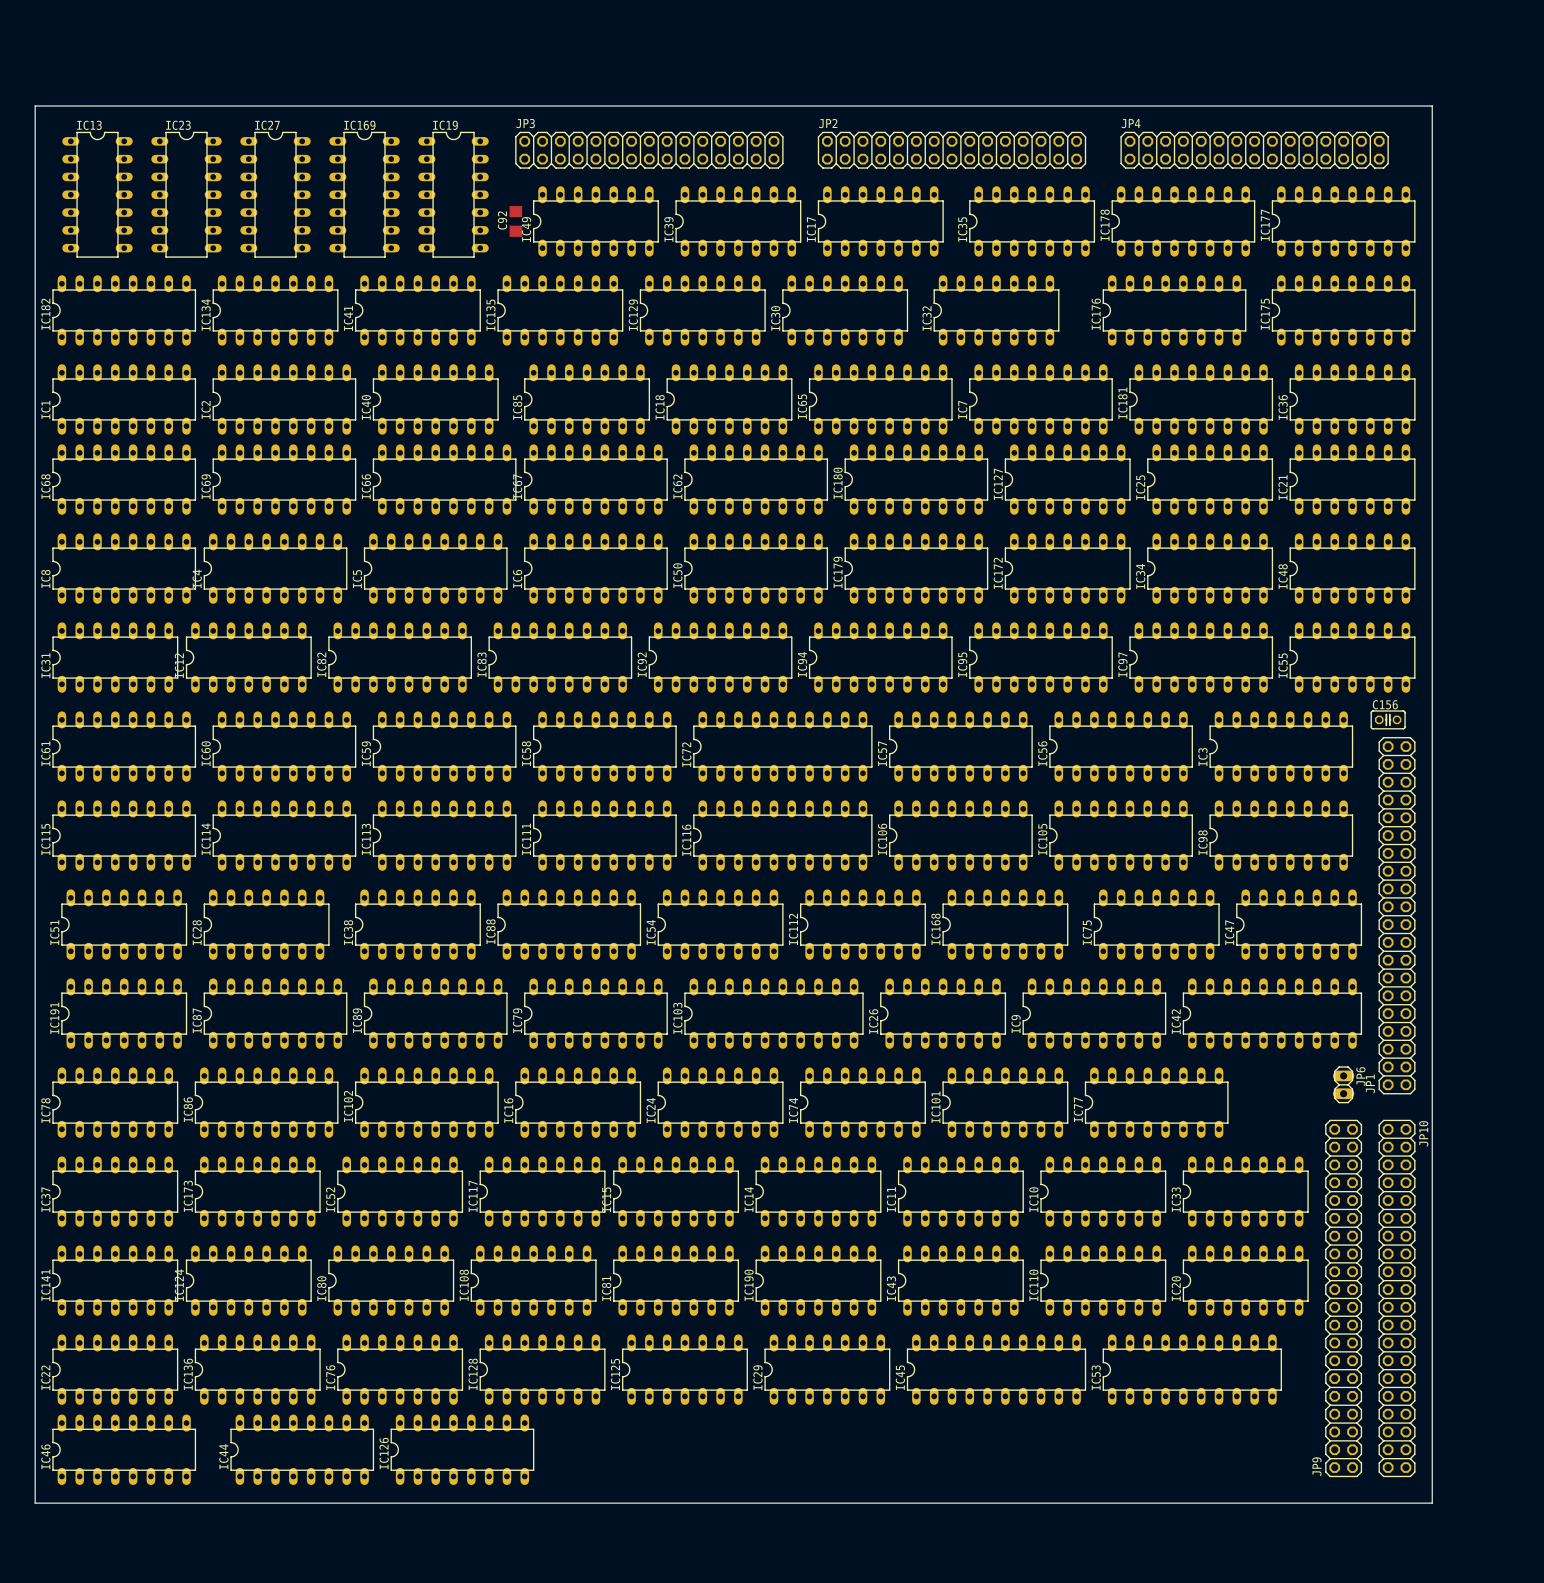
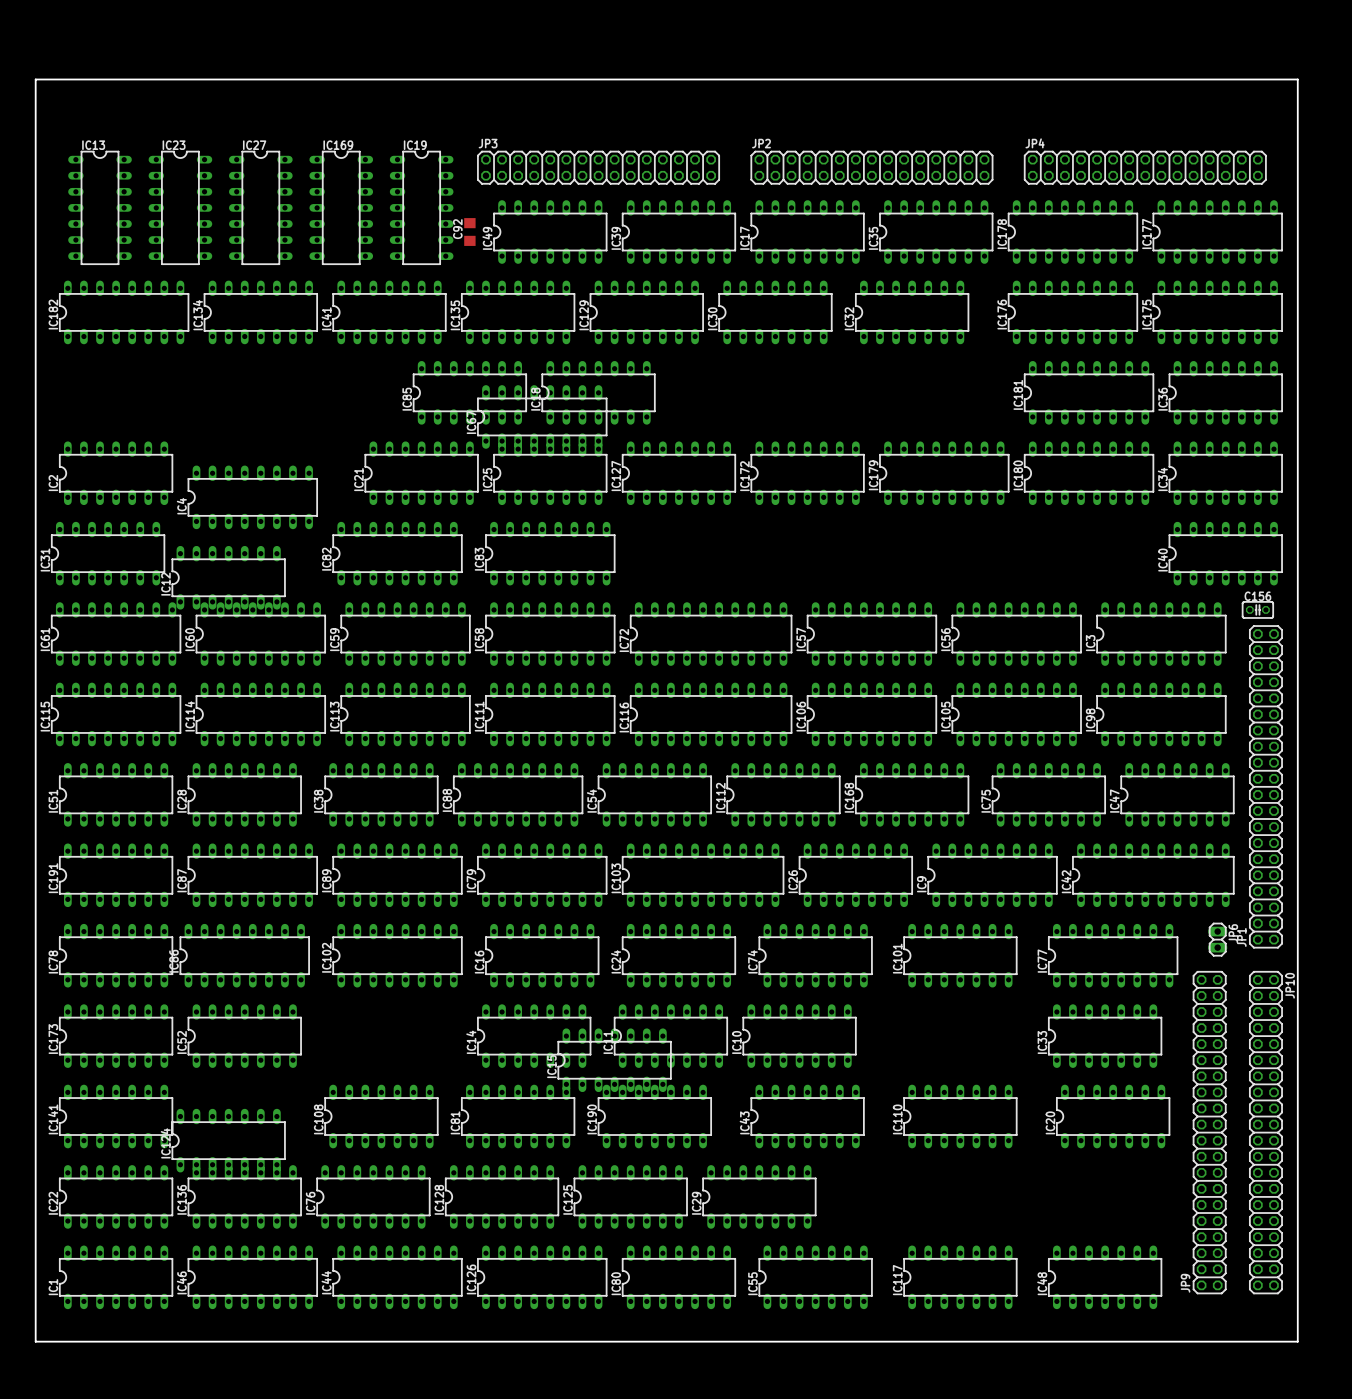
JP3 position: (649, 150) -> (598, 167)
JP2 position: (951, 150) -> (871, 167)
JP4 position: (1254, 150) -> (1145, 167)
IC13 position: (97, 194) -> (100, 207)
IC23 position: (186, 194) -> (180, 207)
IC27 position: (275, 194) -> (260, 207)
IC169 position: (364, 194) -> (341, 207)
IC19 position: (453, 194) -> (421, 207)
C92 position: (515, 221) -> (469, 232)
IC49 position: (595, 221) -> (550, 232)
IC39 position: (738, 221) -> (678, 232)
IC17 position: (880, 221) -> (807, 232)
IC35 position: (1032, 221) -> (936, 232)
IC178 position: (1183, 221) -> (1072, 232)
IC177 position: (1343, 221) -> (1217, 232)
IC182 position: (124, 310) -> (124, 312)
IC134 position: (275, 310) -> (260, 312)
IC41 position: (417, 310) -> (389, 312)
IC135 position: (560, 310) -> (518, 312)
IC129 position: (702, 310) -> (646, 312)
IC30 position: (845, 310) -> (775, 312)
IC32 position: (996, 310) -> (912, 312)
IC176 position: (1174, 310) -> (1072, 312)
IC175 position: (1343, 310) -> (1217, 312)
IC1 footprint: [52, 364, 196, 435] -> [59, 1245, 173, 1310]
IC2 footprint: [212, 364, 357, 435] -> [59, 441, 173, 506]
IC40 position: (435, 399) -> (1225, 553)
IC85 position: (587, 399) -> (469, 392)
IC18 position: (729, 399) -> (598, 392)
IC65: (880, 399) -> none
IC7: (1041, 399) -> none
IC181 position: (1201, 399) -> (1089, 392)
IC36 position: (1352, 399) -> (1225, 392)
IC68: (124, 479) -> none
IC69: (284, 479) -> none
IC66: (444, 479) -> none
IC62: (756, 479) -> none
IC180 position: (916, 479) -> (1089, 473)
IC127 position: (1067, 479) -> (678, 473)
IC25 position: (1210, 479) -> (550, 473)
IC21 position: (1352, 479) -> (421, 473)
IC8: (124, 568) -> none
IC5: (435, 568) -> none
IC6: (595, 568) -> none
IC50: (756, 568) -> none
IC179 position: (916, 568) -> (944, 473)
IC172 position: (1067, 568) -> (807, 473)
IC34 position: (1210, 568) -> (1225, 473)
IC48 position: (1352, 568) -> (1105, 1277)
IC31 position: (115, 657) -> (108, 553)
IC82 position: (400, 657) -> (397, 553)
IC83 position: (560, 657) -> (550, 553)
IC92: (720, 657) -> none
IC94: (880, 657) -> none
IC95: (1041, 657) -> none
IC97: (1201, 657) -> none
IC55 position: (1352, 657) -> (815, 1277)
C156 position: (1388, 719) -> (1257, 609)
IC61 position: (124, 746) -> (116, 634)
IC60 position: (284, 746) -> (260, 634)
IC59 position: (444, 746) -> (405, 634)
IC58 position: (604, 746) -> (550, 634)
IC72 position: (782, 746) -> (711, 634)
IC57 position: (960, 746) -> (871, 634)
IC56 position: (1121, 746) -> (1016, 634)
IC3 position: (1281, 746) -> (1161, 634)
IC115 position: (124, 835) -> (116, 714)
IC114 position: (284, 835) -> (260, 714)
IC113 position: (444, 835) -> (405, 714)
IC111 position: (604, 835) -> (550, 714)
IC116 position: (782, 835) -> (711, 714)
IC106 position: (960, 835) -> (871, 714)
IC105 position: (1121, 835) -> (1016, 714)
IC98 position: (1281, 835) -> (1161, 714)
JP1 position: (1397, 915) -> (1265, 786)
IC51 position: (124, 924) -> (116, 794)
IC28 position: (266, 924) -> (244, 794)
IC38 position: (417, 924) -> (381, 794)
IC88 position: (569, 924) -> (518, 794)
IC54 position: (720, 924) -> (654, 794)
IC112 position: (862, 924) -> (783, 794)
IC168 position: (1005, 924) -> (912, 794)
IC75 position: (1156, 924) -> (1048, 794)
IC47 position: (1299, 924) -> (1177, 794)
IC191 position: (124, 1013) -> (116, 875)
IC87 position: (275, 1013) -> (252, 875)
IC89 position: (435, 1013) -> (397, 875)
IC79 position: (595, 1013) -> (542, 875)
IC103 position: (773, 1013) -> (703, 875)
IC26 position: (943, 1013) -> (855, 875)
IC9 position: (1094, 1013) -> (992, 875)
IC42 position: (1272, 1013) -> (1153, 875)
JP6 position: (1343, 1084) -> (1217, 939)
IC78 position: (115, 1102) -> (116, 955)
IC86 position: (266, 1102) -> (244, 955)
IC102 position: (426, 1102) -> (397, 955)
IC16 position: (578, 1102) -> (542, 955)
IC24 position: (720, 1102) -> (678, 955)
IC74 position: (862, 1102) -> (815, 955)
IC101 position: (1005, 1102) -> (960, 955)
IC77 position: (1156, 1102) -> (1113, 955)
IC37: (115, 1191) -> none
IC173 position: (257, 1191) -> (116, 1036)
IC52 position: (400, 1191) -> (244, 1036)
IC117 position: (542, 1191) -> (960, 1277)
IC14 position: (818, 1191) -> (534, 1036)
IC11 position: (960, 1191) -> (670, 1036)
IC10 position: (1103, 1191) -> (799, 1036)
IC33 position: (1245, 1191) -> (1105, 1036)
IC141 position: (115, 1280) -> (116, 1116)
IC80 position: (391, 1280) -> (678, 1277)
IC108 position: (533, 1280) -> (381, 1116)
IC81 position: (676, 1280) -> (518, 1116)
IC190 position: (818, 1280) -> (654, 1116)
IC43 position: (960, 1280) -> (807, 1116)
IC110 position: (1103, 1280) -> (960, 1116)
IC20 position: (1245, 1280) -> (1113, 1116)
JP9 position: (1343, 1298) -> (1209, 1132)
JP10 position: (1397, 1298) -> (1265, 1132)
IC22 position: (115, 1369) -> (116, 1196)
IC136 position: (257, 1369) -> (244, 1196)
IC76 position: (400, 1369) -> (373, 1196)
IC128 position: (542, 1369) -> (502, 1196)
IC125 position: (684, 1369) -> (630, 1196)
IC29 position: (827, 1369) -> (759, 1196)
IC45: (996, 1369) -> none
IC53: (1192, 1369) -> none
IC46 position: (124, 1449) -> (252, 1277)
IC44 position: (302, 1449) -> (397, 1277)
IC126 position: (462, 1449) -> (542, 1277)

